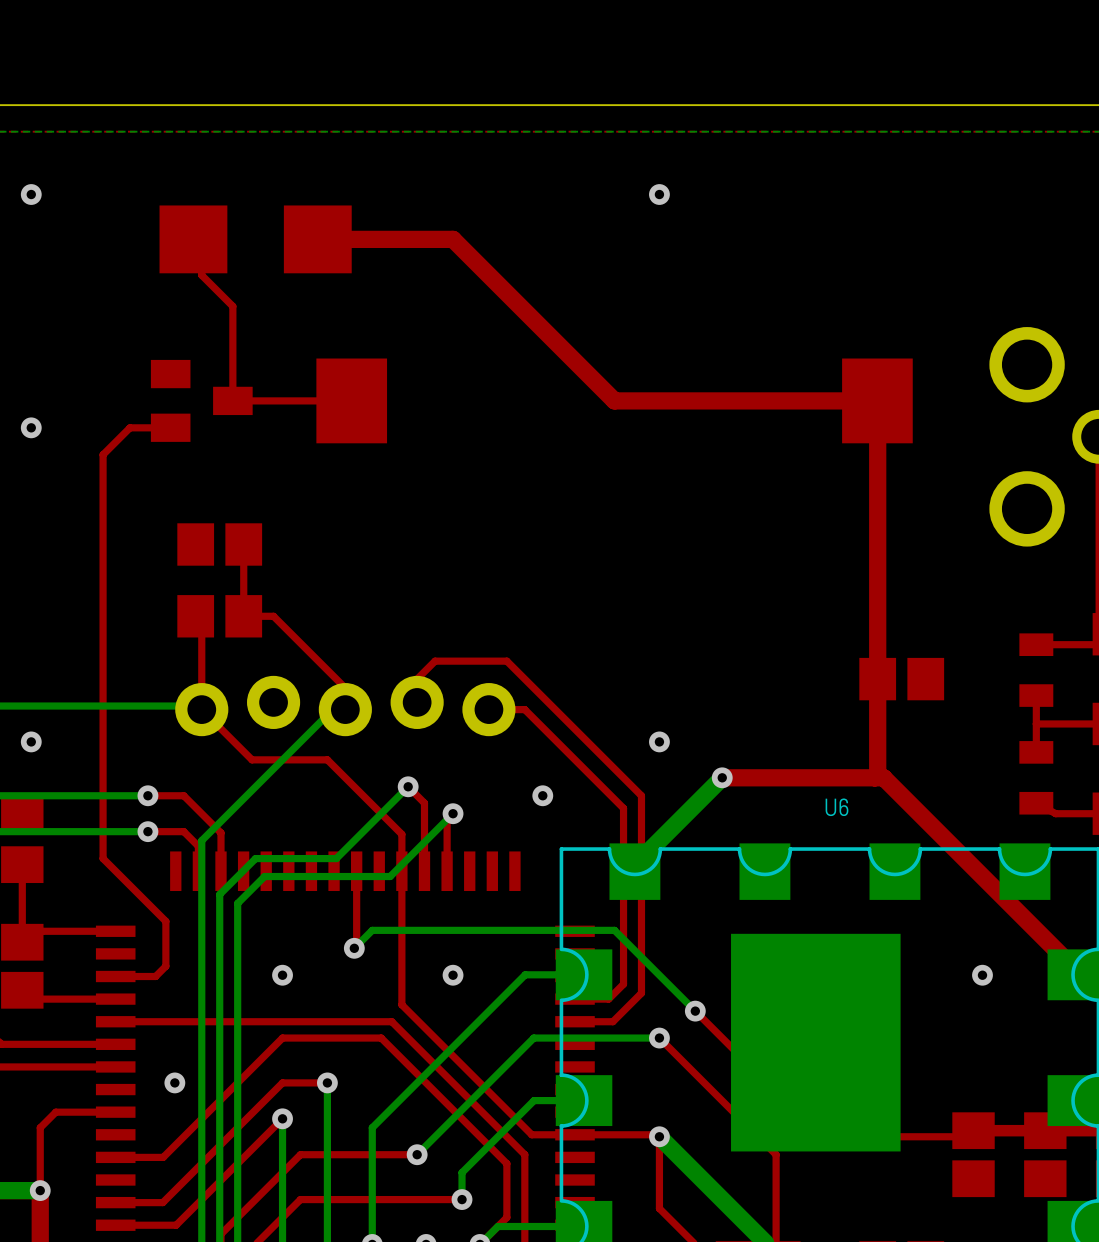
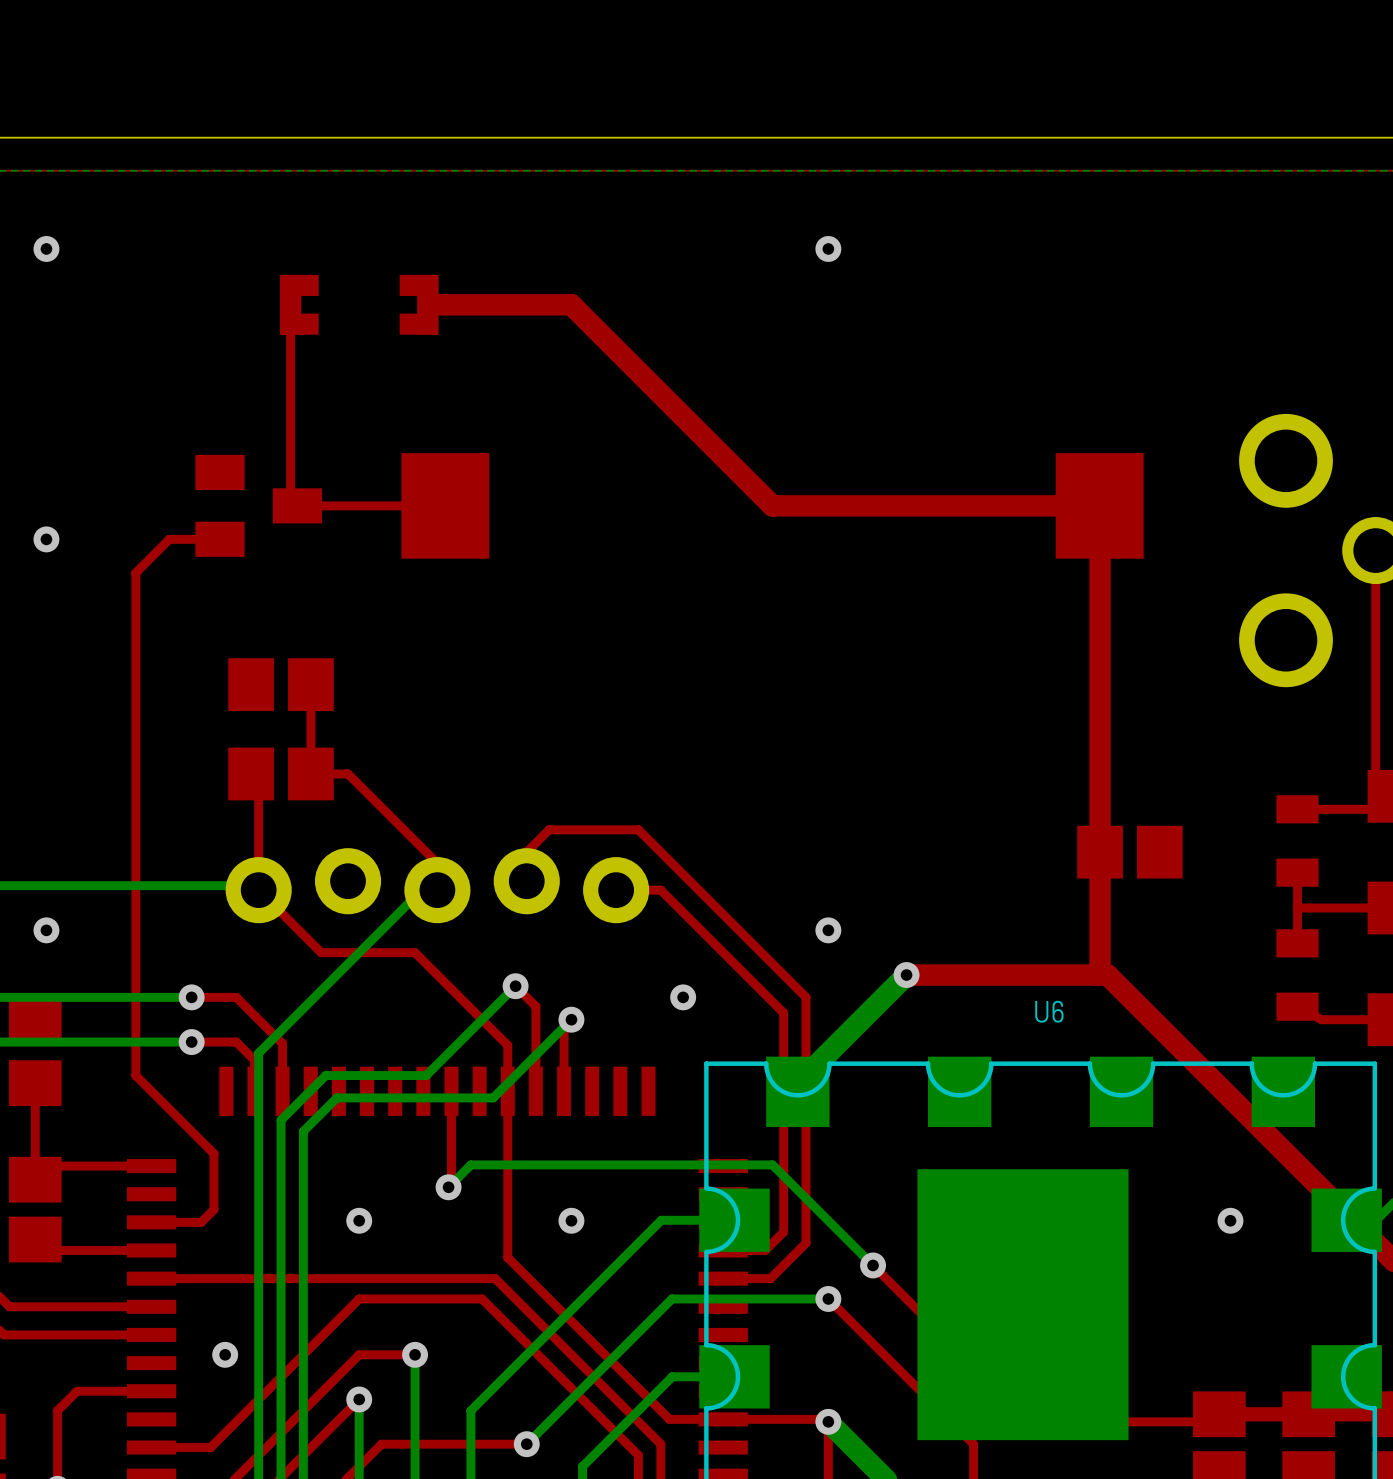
part footprint: [159, 205, 352, 274] -> [280, 274, 439, 335]
top track: (193, 239) (201, 247) (201, 275) (232, 306) (232, 400) -> (290, 304) (290, 505) (297, 505)

